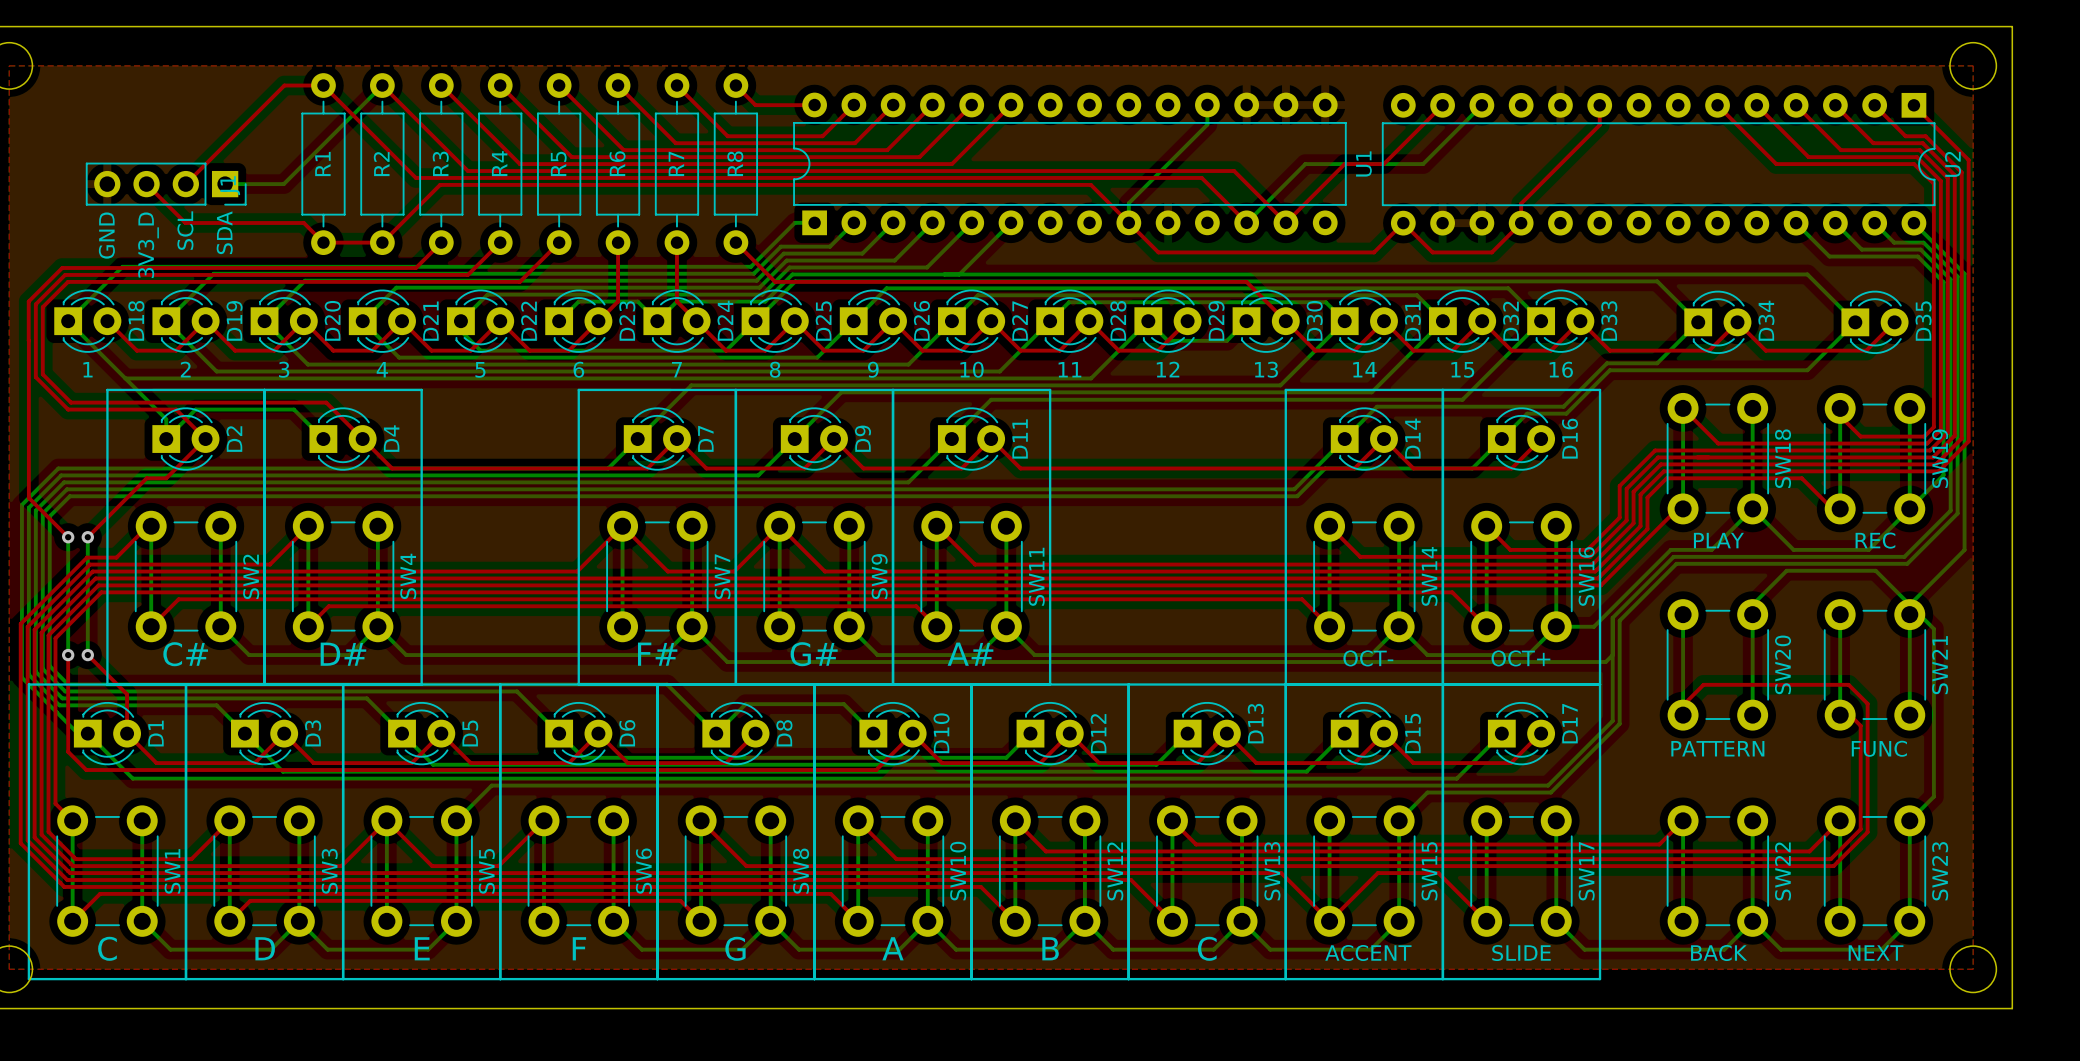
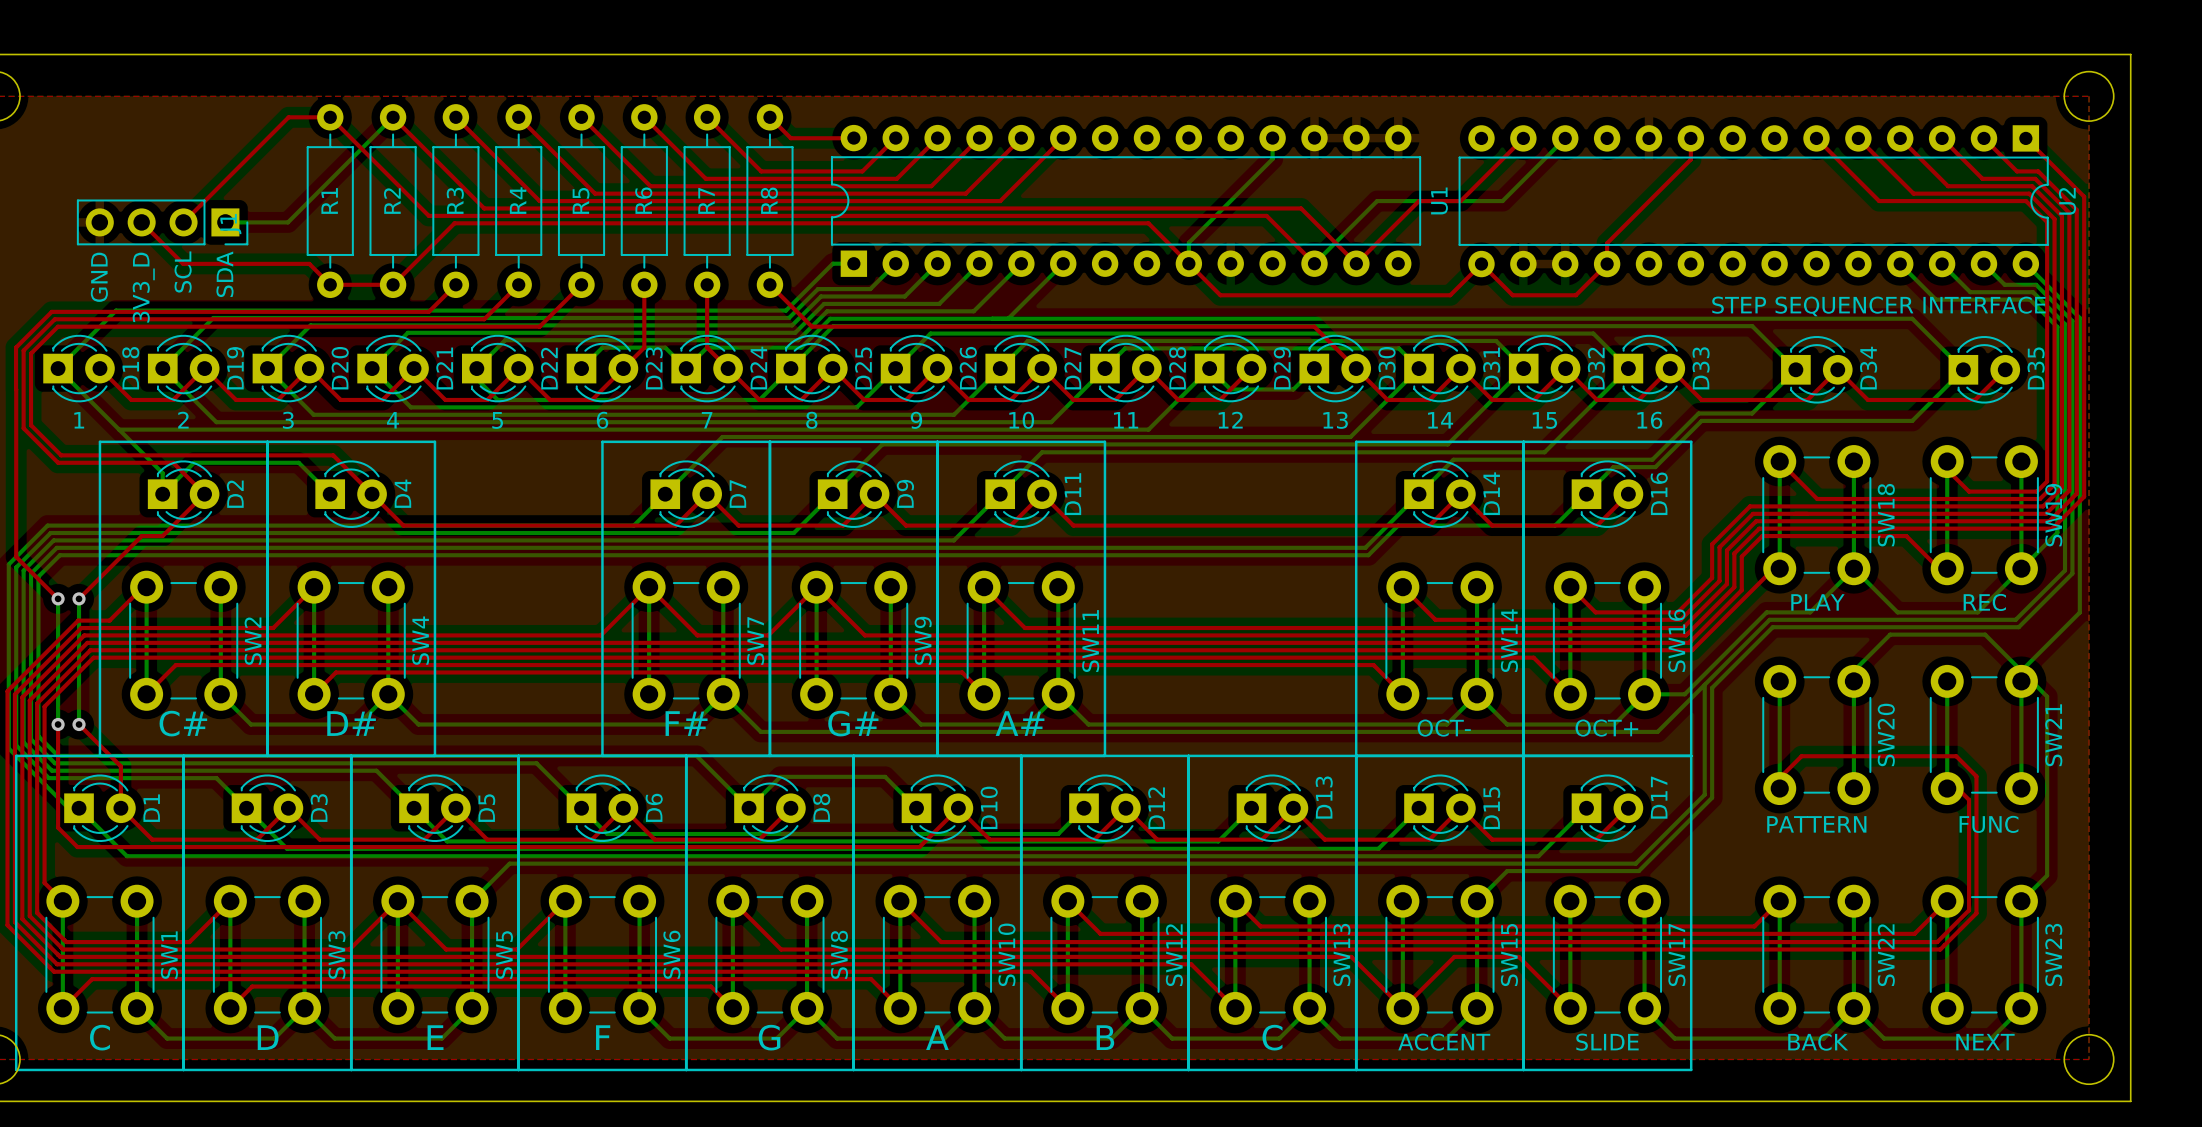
text: none -> STEP SEQUENCER INTERFACE (1878, 306)
bottom track: (1612, 655) (1605, 662) (1568, 662) -> (1704, 684) (1657, 731)

